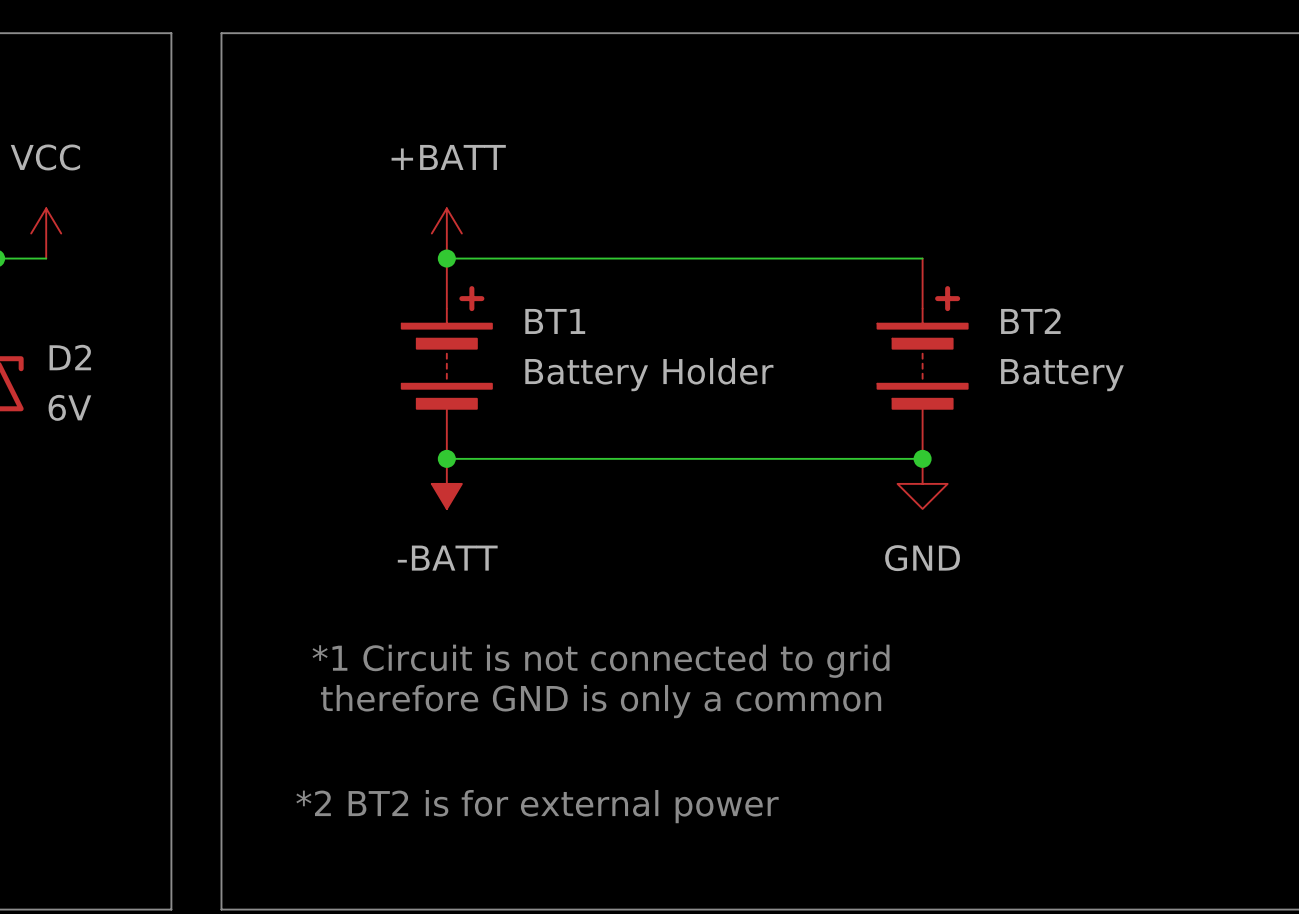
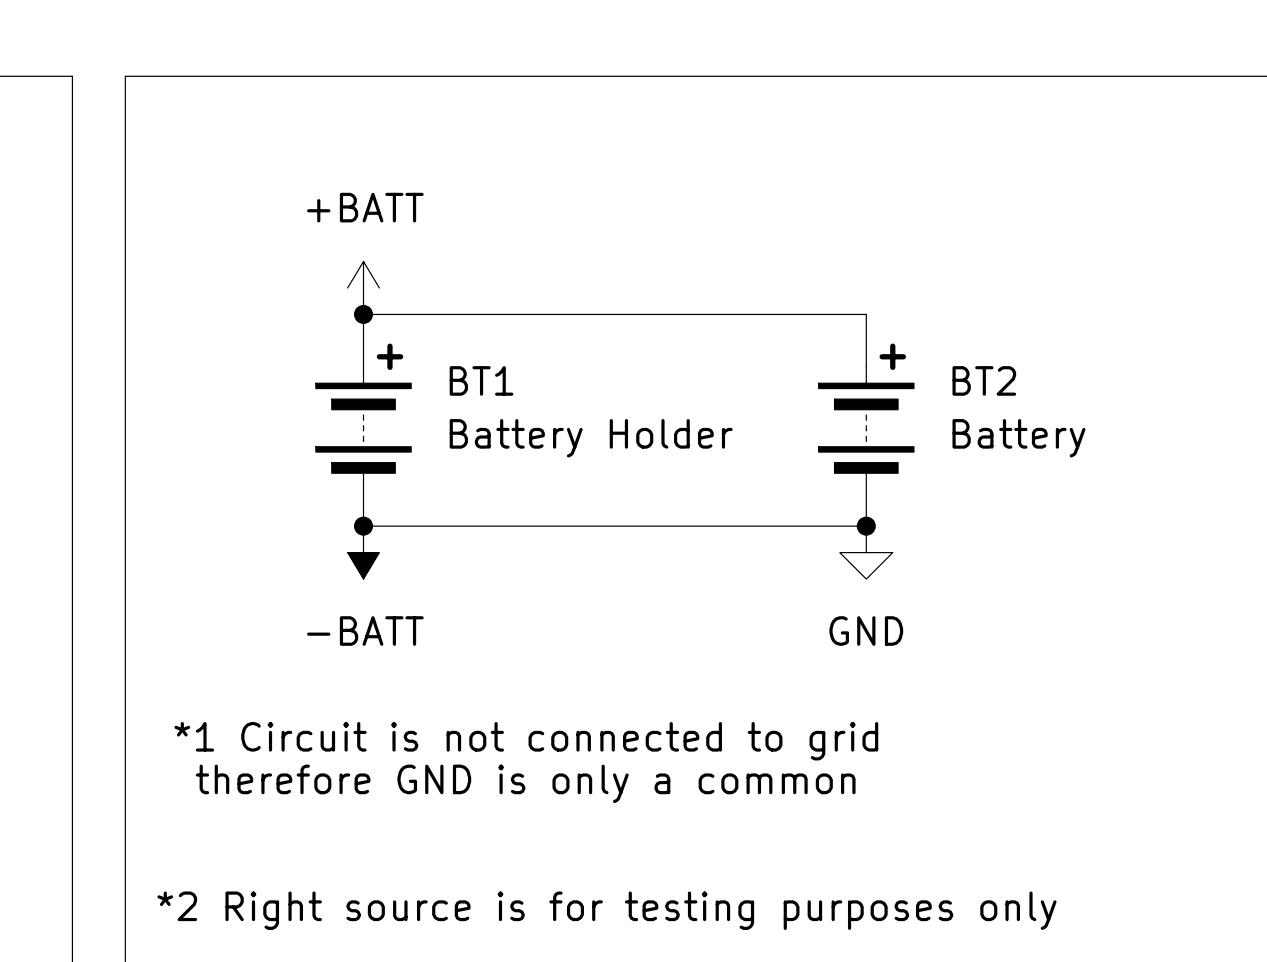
text: *2 BT2 is for external power (537, 806) -> none
text: none -> *2 Right source is for testing purposes only (606, 910)

